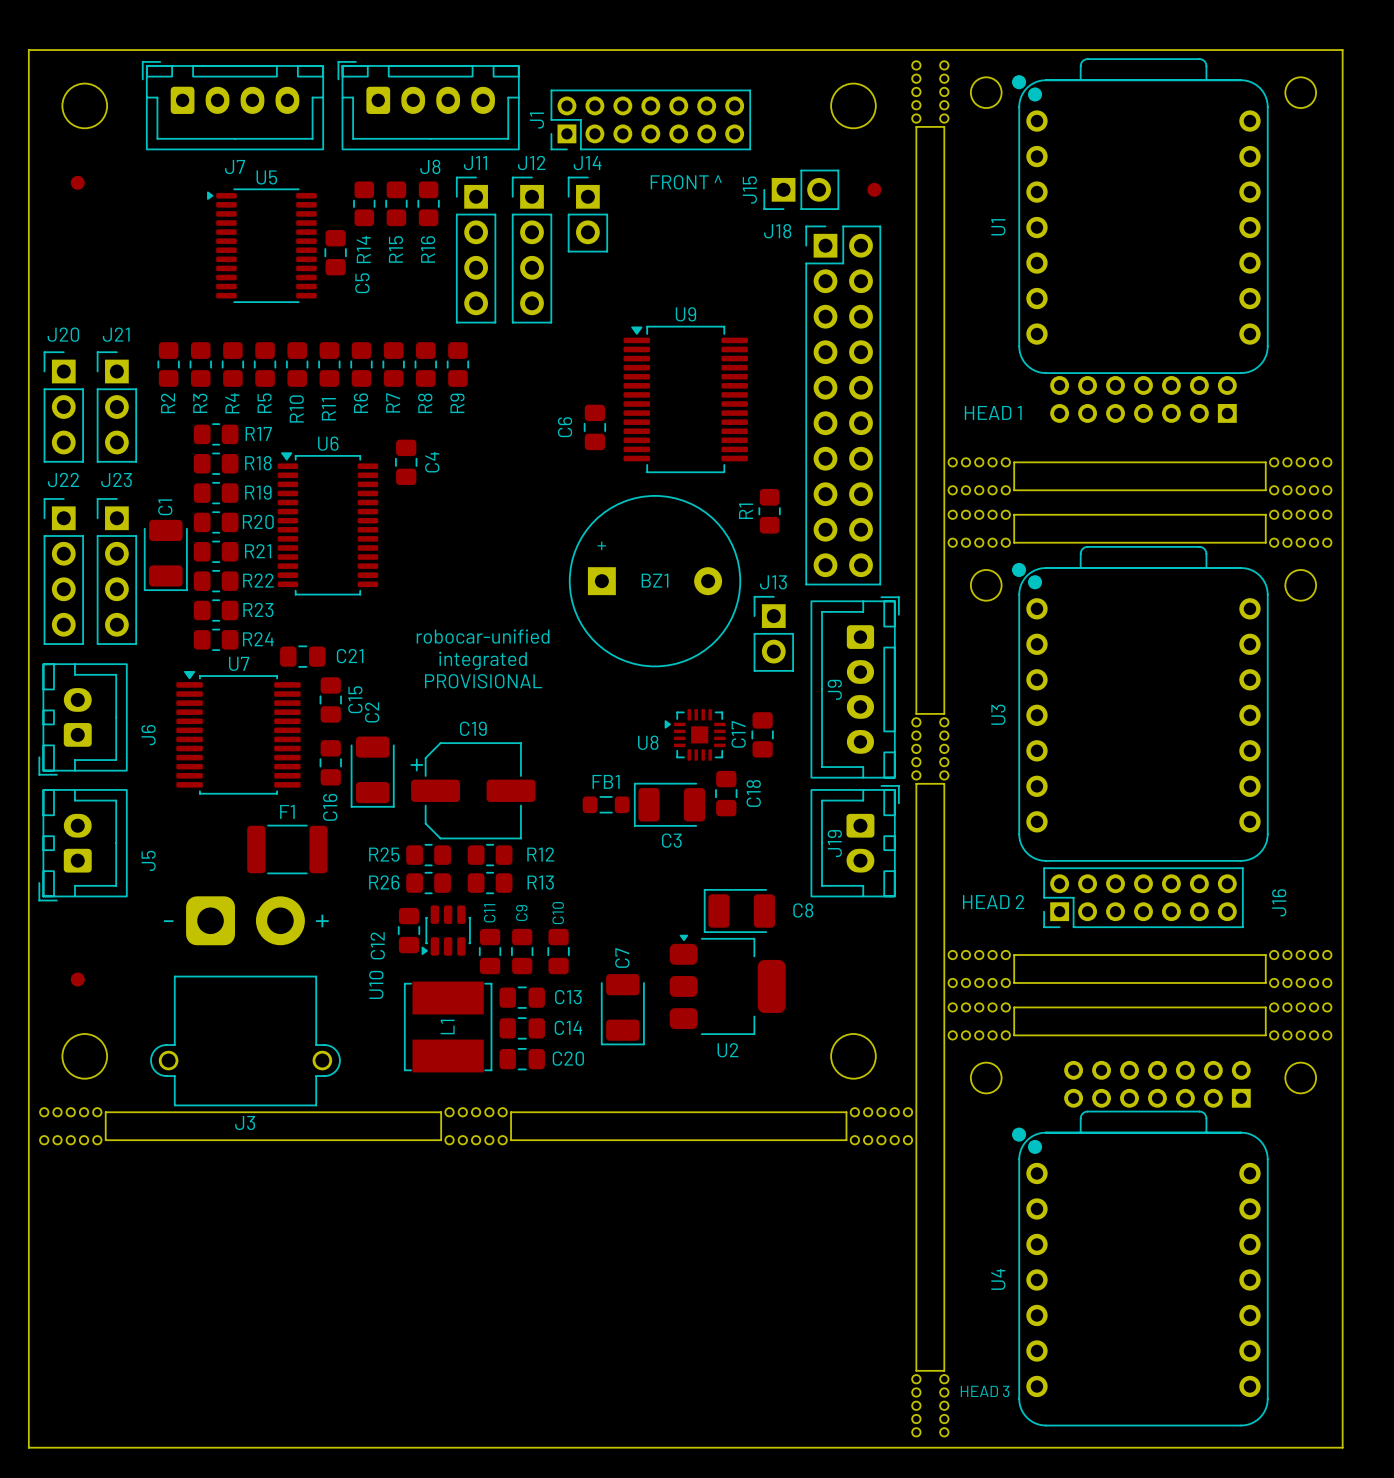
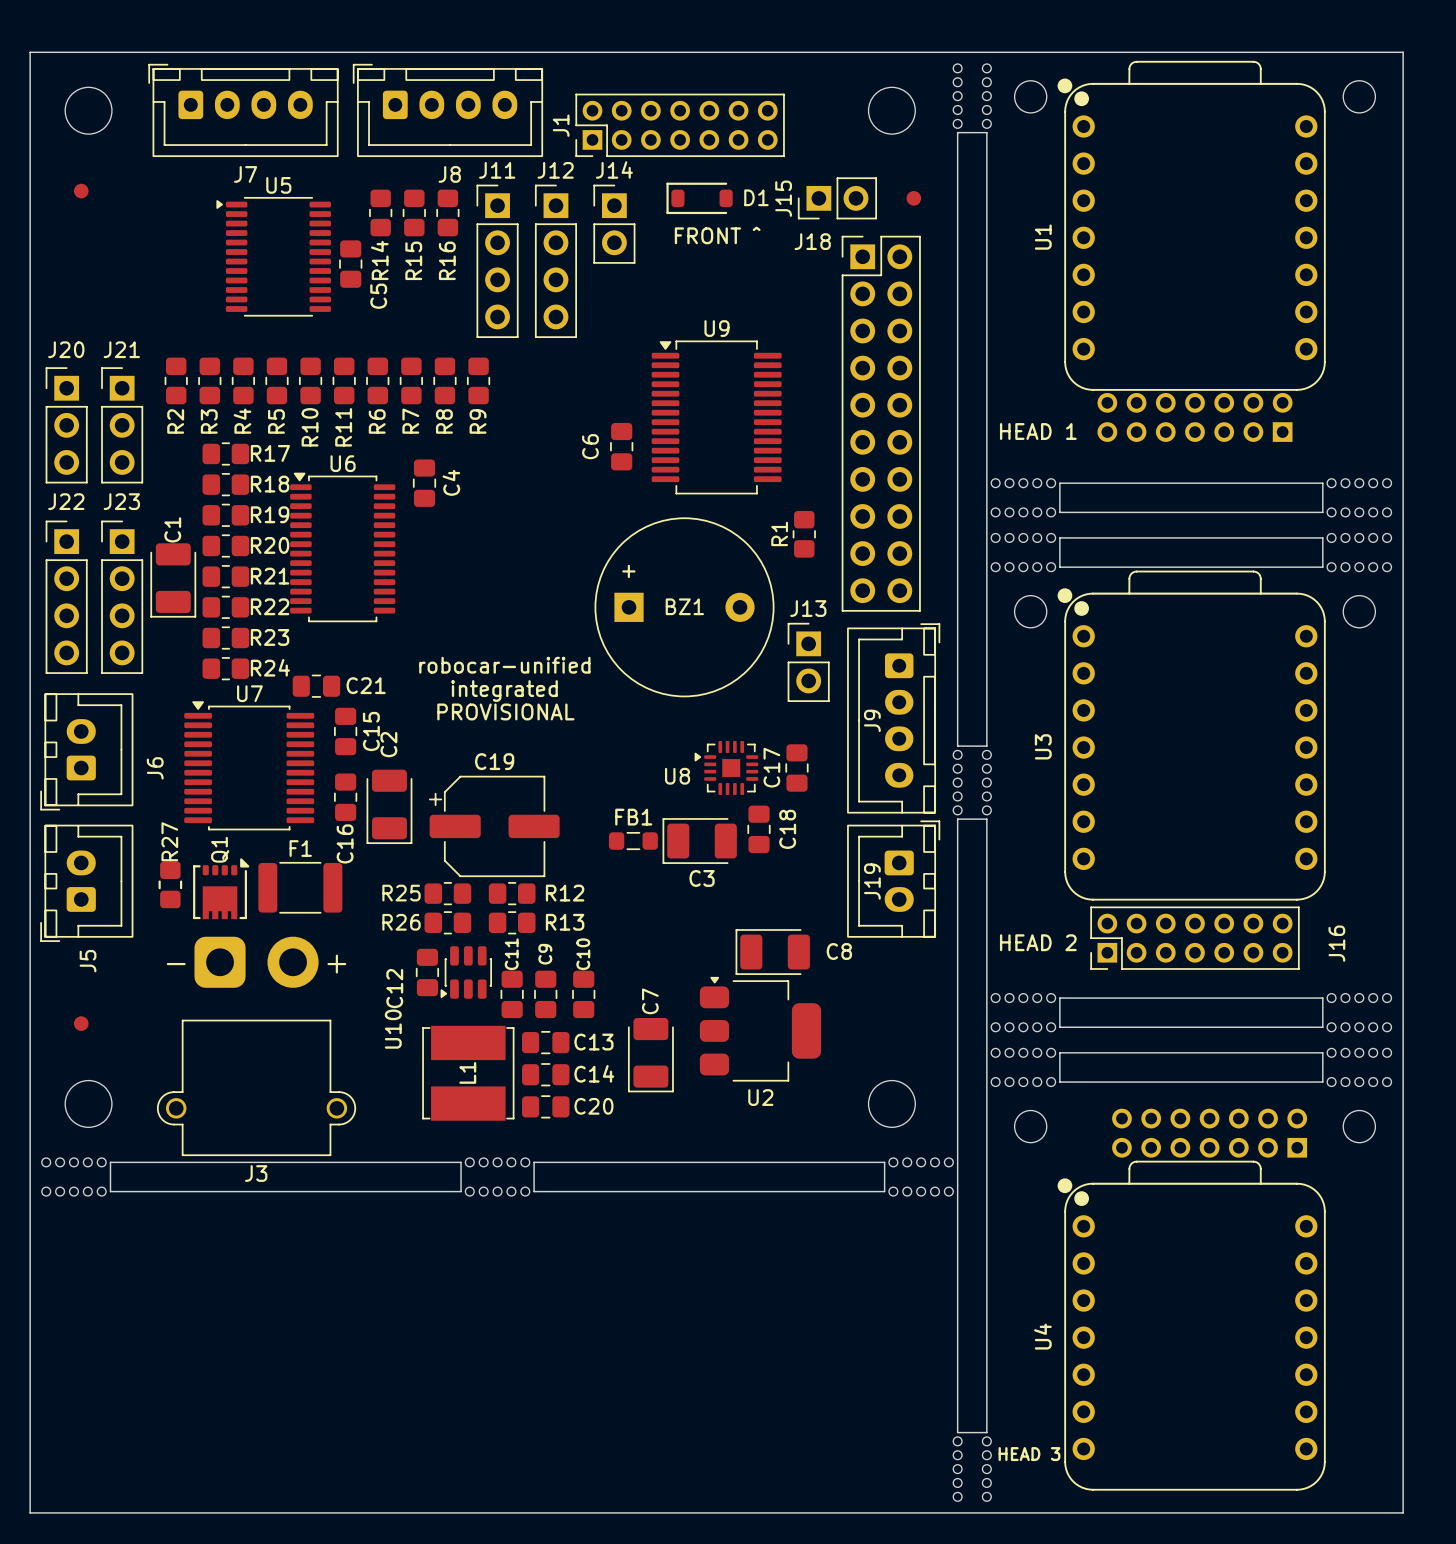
text position: FRONT ^ (686, 182) -> FRONT ^ (717, 235)
D1: none -> (699, 198)
R27: none -> (170, 884)
Q1: none -> (221, 888)
J5 name position: J5 (148, 860) -> J5 (88, 961)

